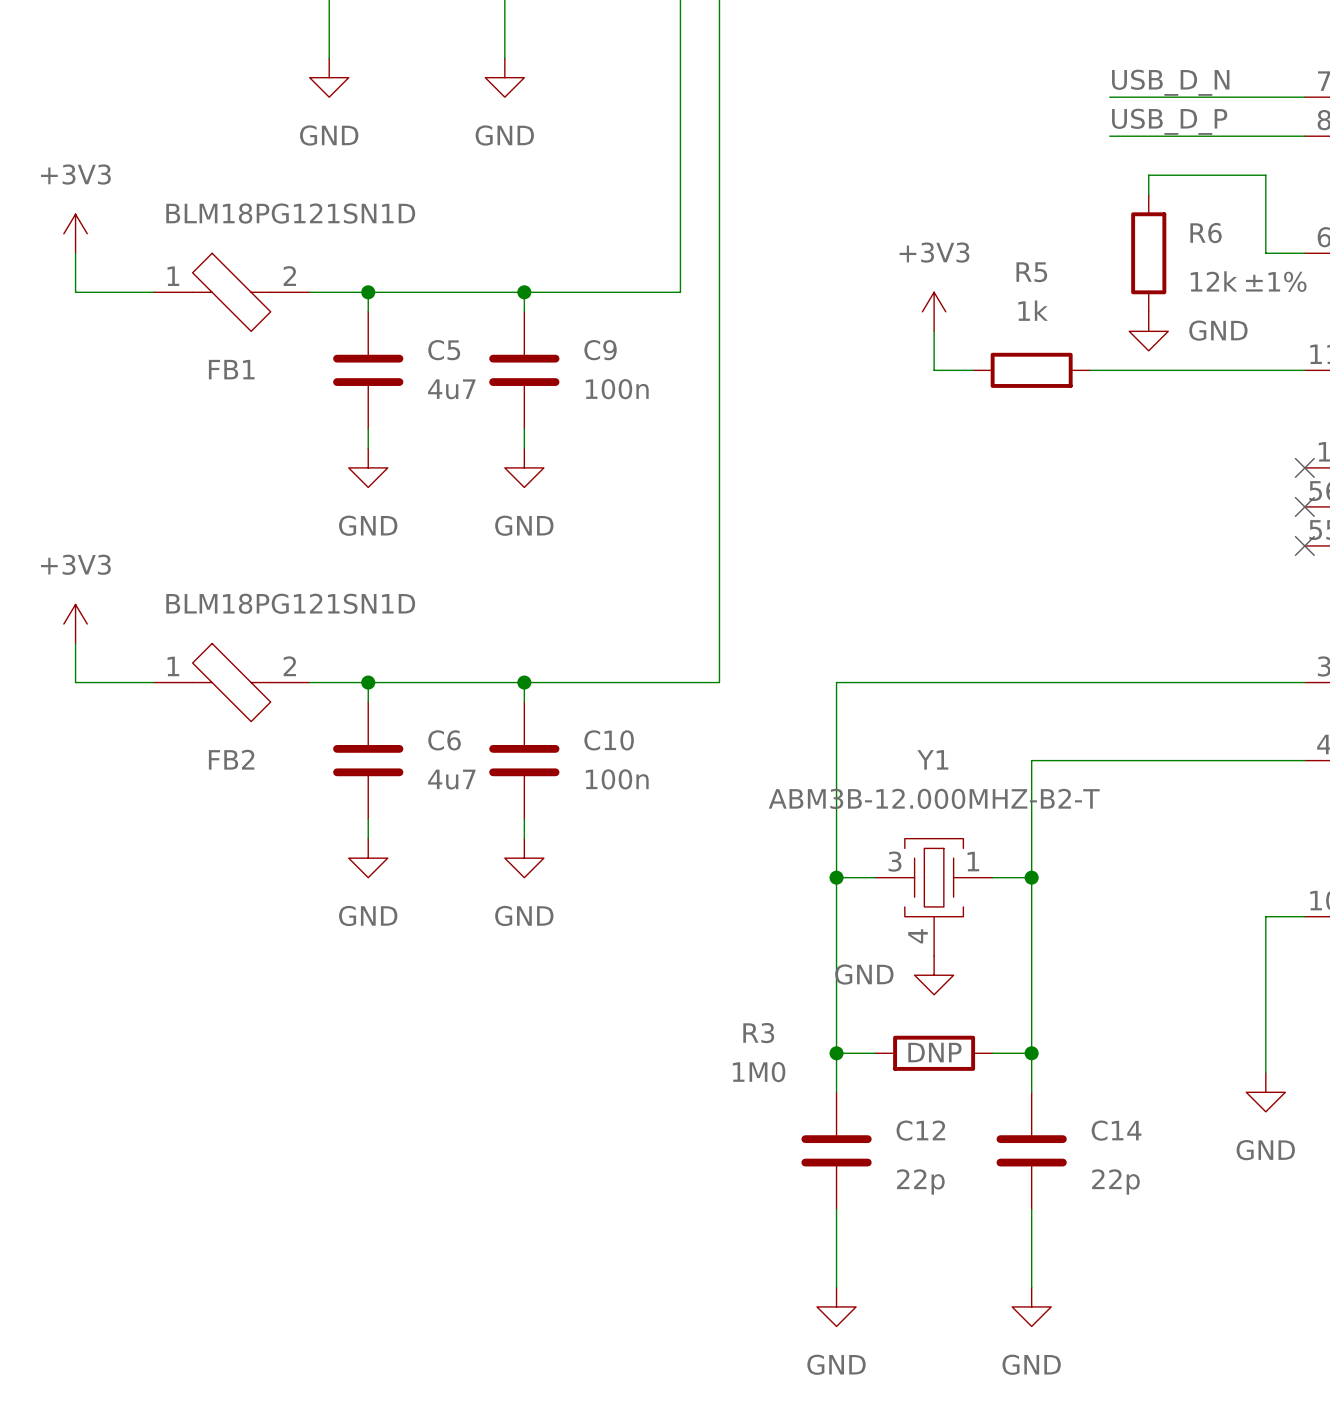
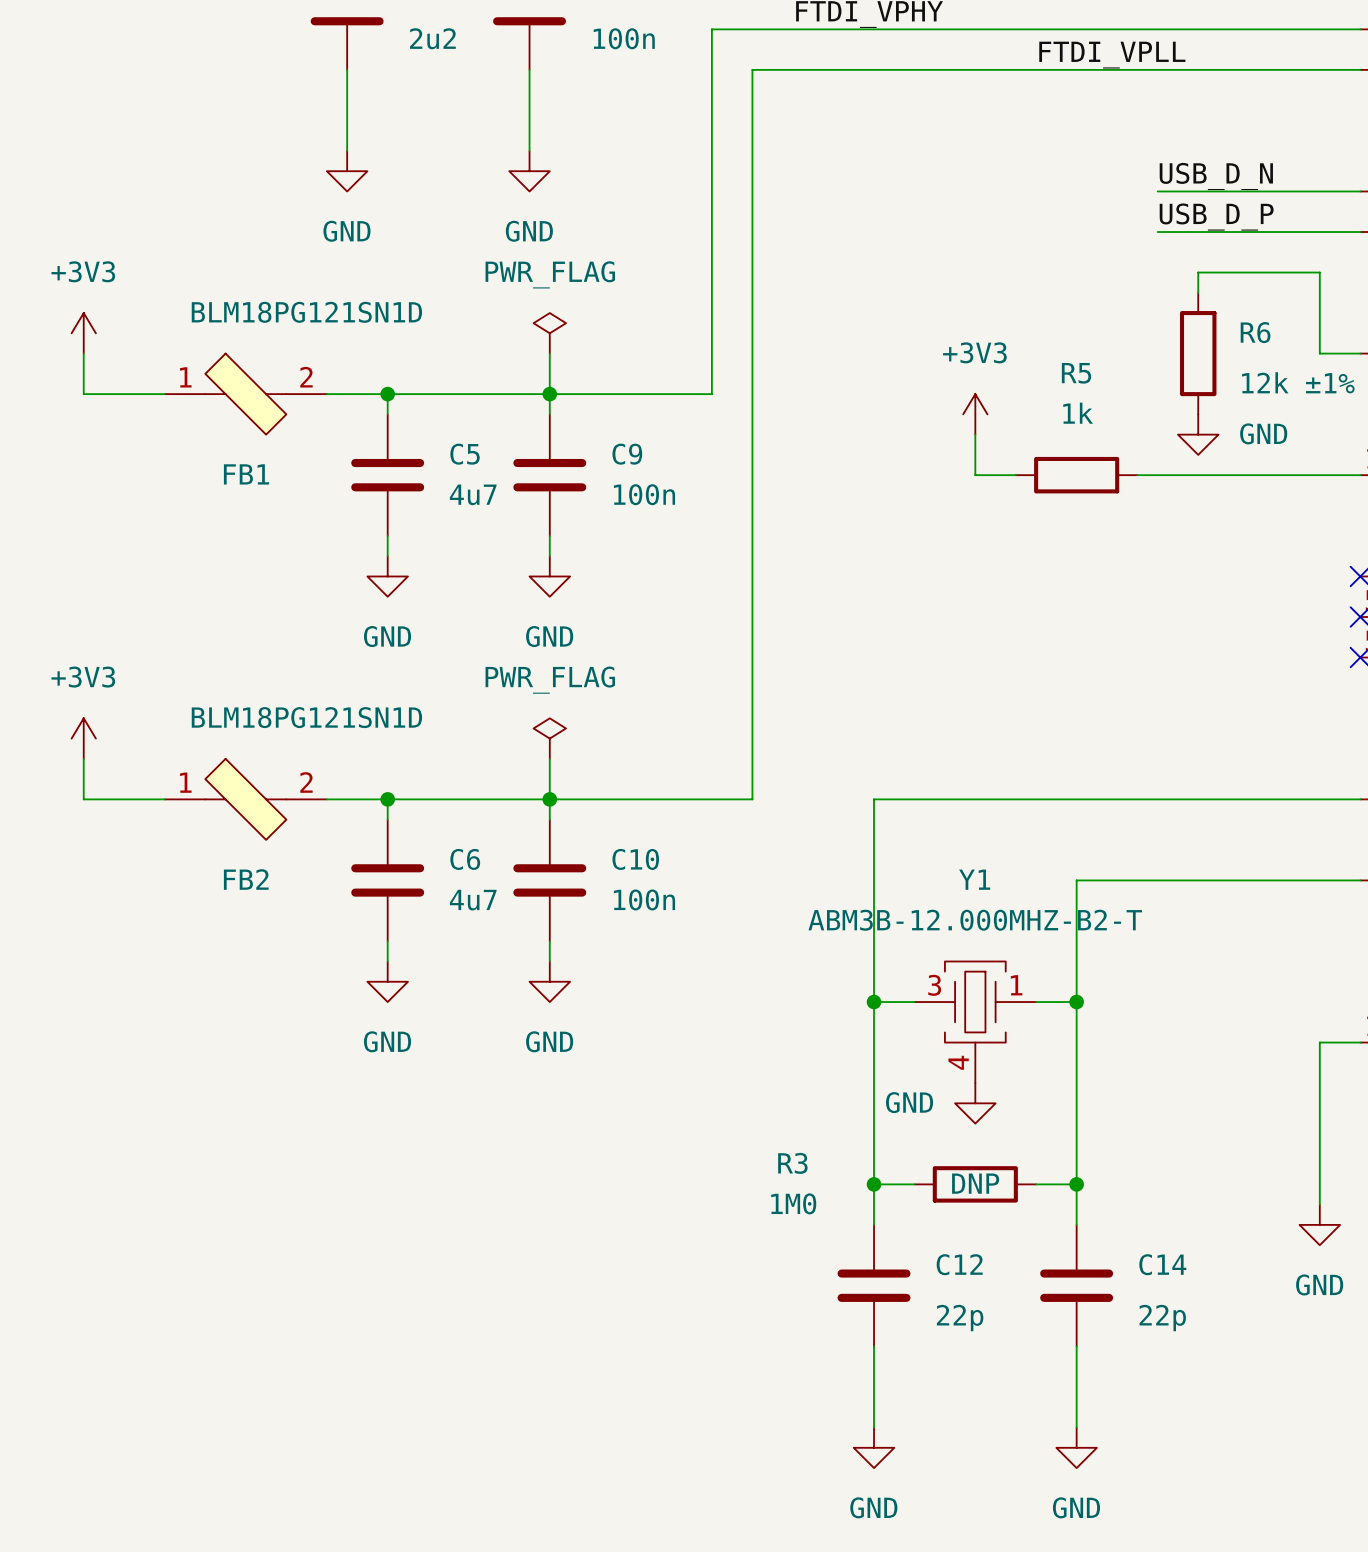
power symbol: none -> PWR_FLAG (549, 333)
wire: none -> (549, 353) (549, 394)
power symbol: none -> PWR_FLAG (549, 738)
wire: none -> (549, 758) (549, 799)

